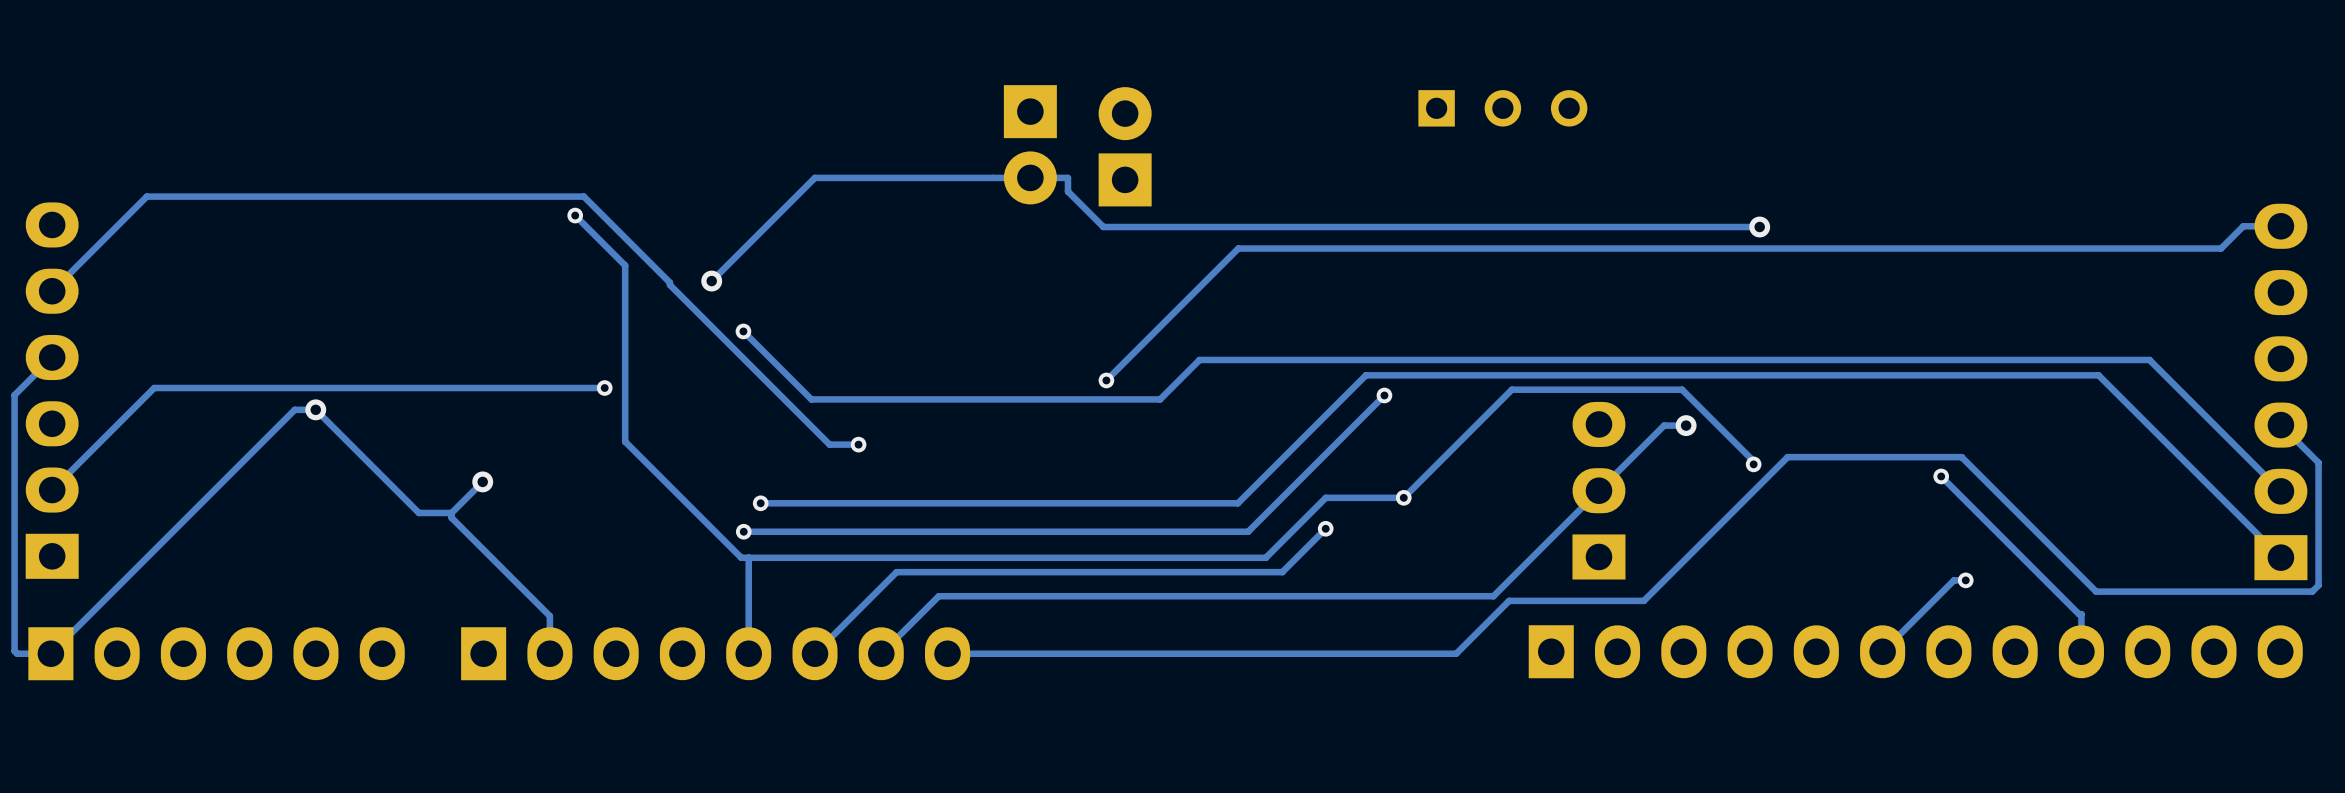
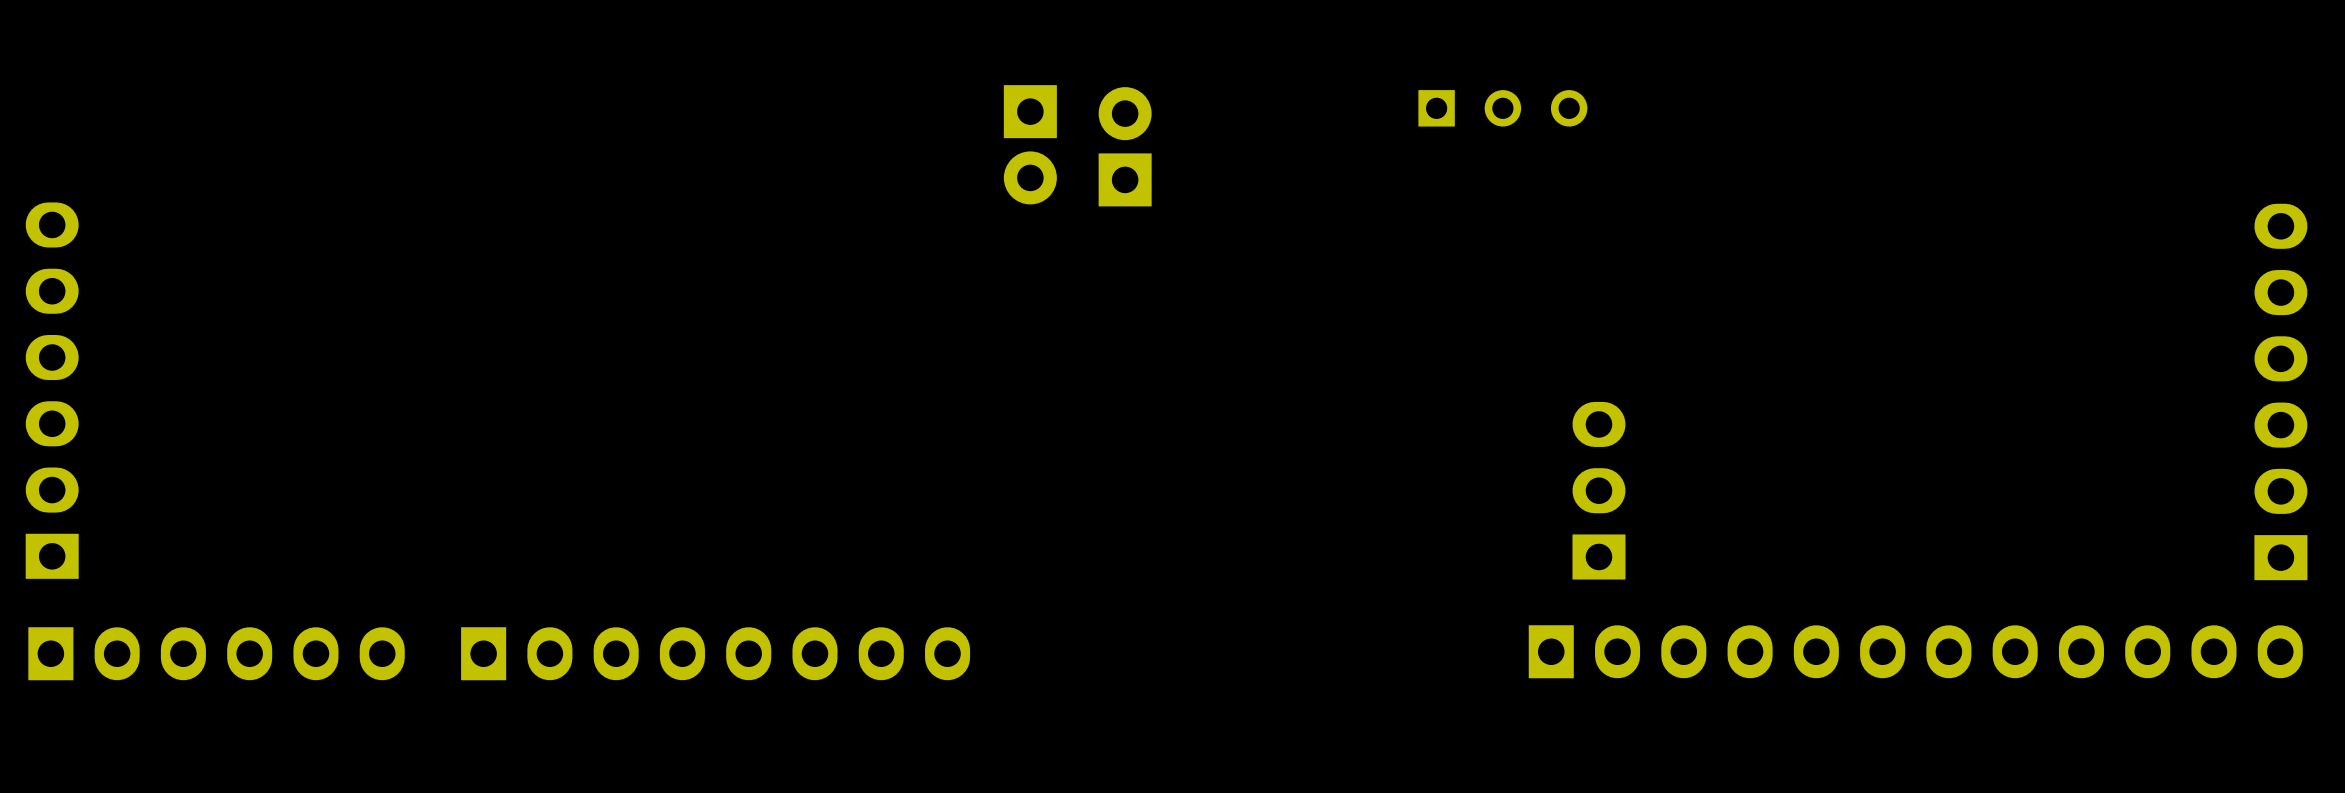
track: (575, 215) (625, 265) (625, 441) (741, 557) (1265, 557) (1325, 497) (1403, 497) (1511, 389) (1682, 389) (1753, 461) (1753, 464) -> none
via: (575, 215) -> none
track: (2280, 226) (2243, 226) (2221, 248) (1238, 248) (1106, 380) -> none
track: (1759, 227) (1103, 227) (1067, 191) (1067, 177) (814, 177) (711, 281) -> none
via: (1759, 227) -> none
via: (711, 281) -> none
track: (52, 291) (146, 196) (583, 196) (829, 444) (858, 444) -> none
track: (743, 331) (811, 399) (1160, 399) (1199, 359) (2149, 359) (2280, 491) -> none
via: (743, 331) -> none
track: (52, 357) (14, 395) (14, 651) (17, 653) (50, 653) (294, 409) (315, 409) (418, 512) (451, 512) -> none
via: (1106, 380) -> none
track: (604, 388) (154, 388) (52, 490) -> none
via: (604, 388) -> none
track: (1384, 395) (1248, 531) (743, 531) -> none
via: (1384, 395) -> none
via: (315, 409) -> none
track: (1686, 425) (1664, 425) (1493, 596) (938, 596) (881, 653) -> none
via: (1686, 425) -> none
track: (2280, 425) (2318, 462) (2318, 585) (2312, 591) (2096, 591) (1961, 457) (1787, 457) (1643, 600) (1509, 600) (1456, 653) (947, 653) -> none
via: (858, 444) -> none
via: (1753, 464) -> none
track: (1941, 476) (2078, 614) (2081, 614) (2081, 651) -> none
via: (1941, 476) -> none
track: (482, 481) (451, 512) -> none
via: (482, 481) -> none
via: (1403, 497) -> none
track: (760, 503) (1237, 503) (1365, 375) (2098, 375) (2280, 557) -> none
via: (760, 503) -> none
track: (451, 512) (451, 517) (549, 616) (549, 653) -> none
track: (1325, 528) (1282, 572) (896, 572) (814, 653) -> none
via: (1325, 528) -> none
via: (743, 531) -> none
track: (748, 557) (748, 653) -> none
track: (1965, 580) (1953, 580) (1882, 651) -> none
via: (1965, 580) -> none

